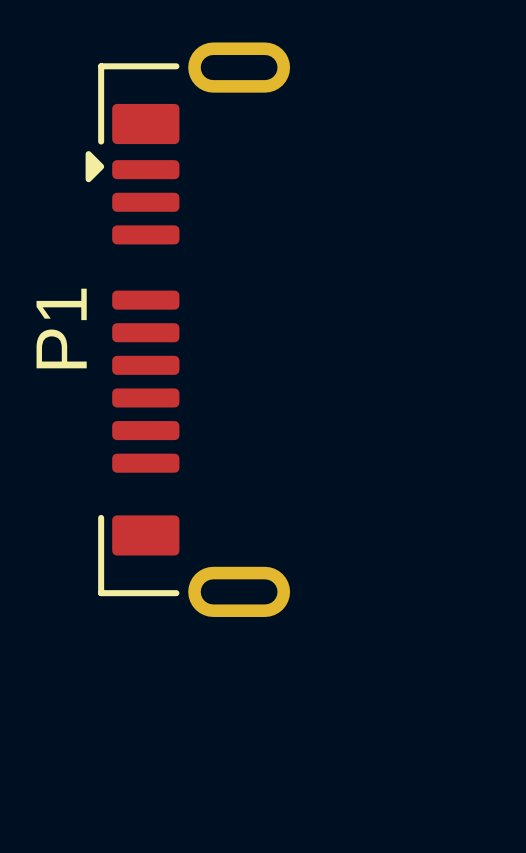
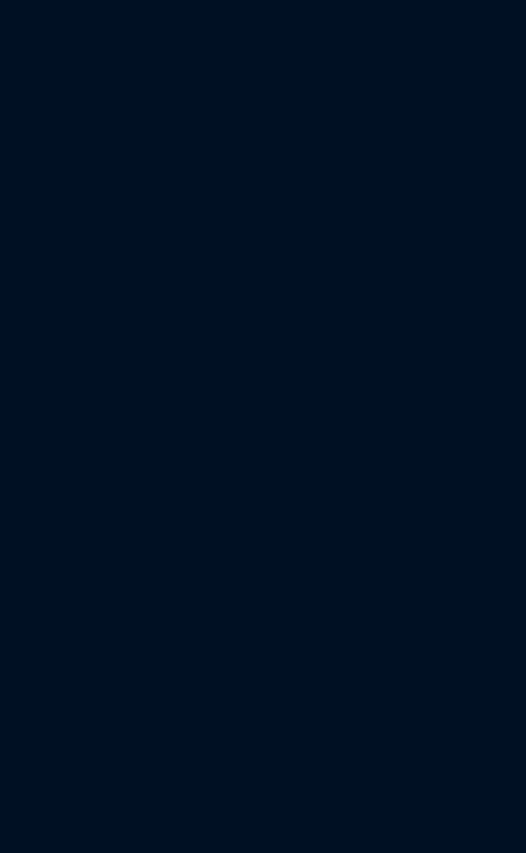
P1: (187, 329) -> none

